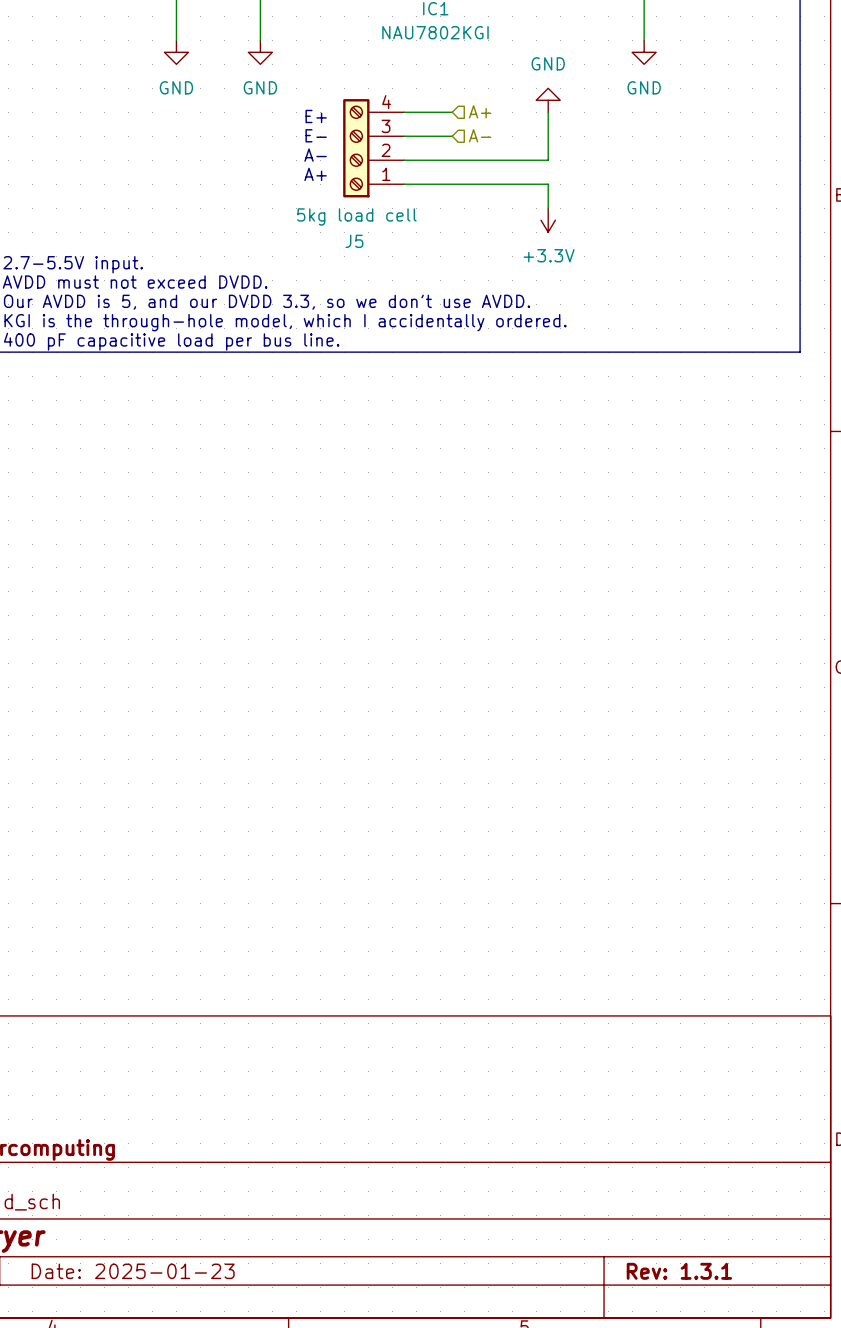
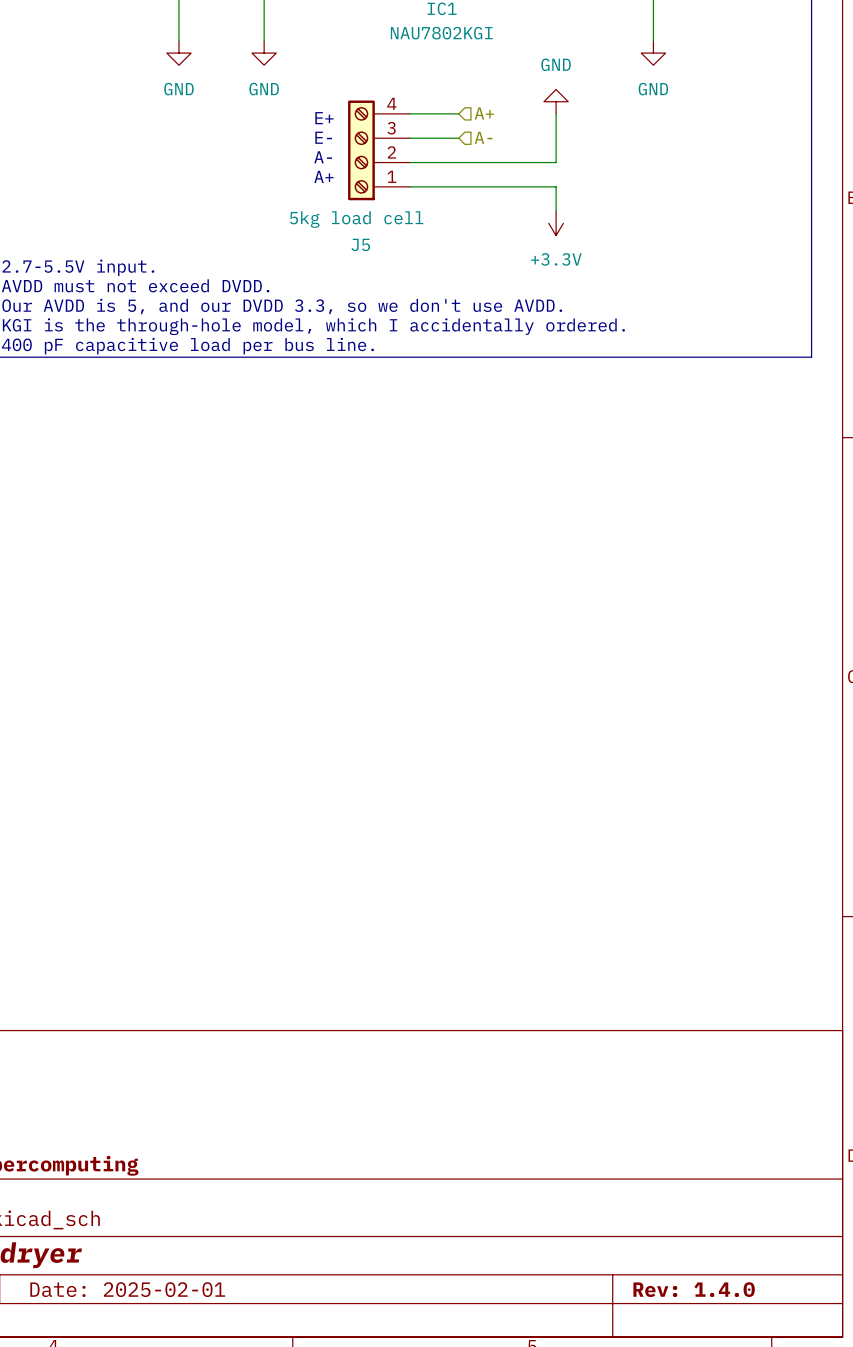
title block: Date: 2025-01-23 (133, 1271) -> Date: 2025-02-01 (127, 1289)
title block: Rev: 1.3.1 (679, 1271) -> Rev: 1.4.0 (694, 1289)

